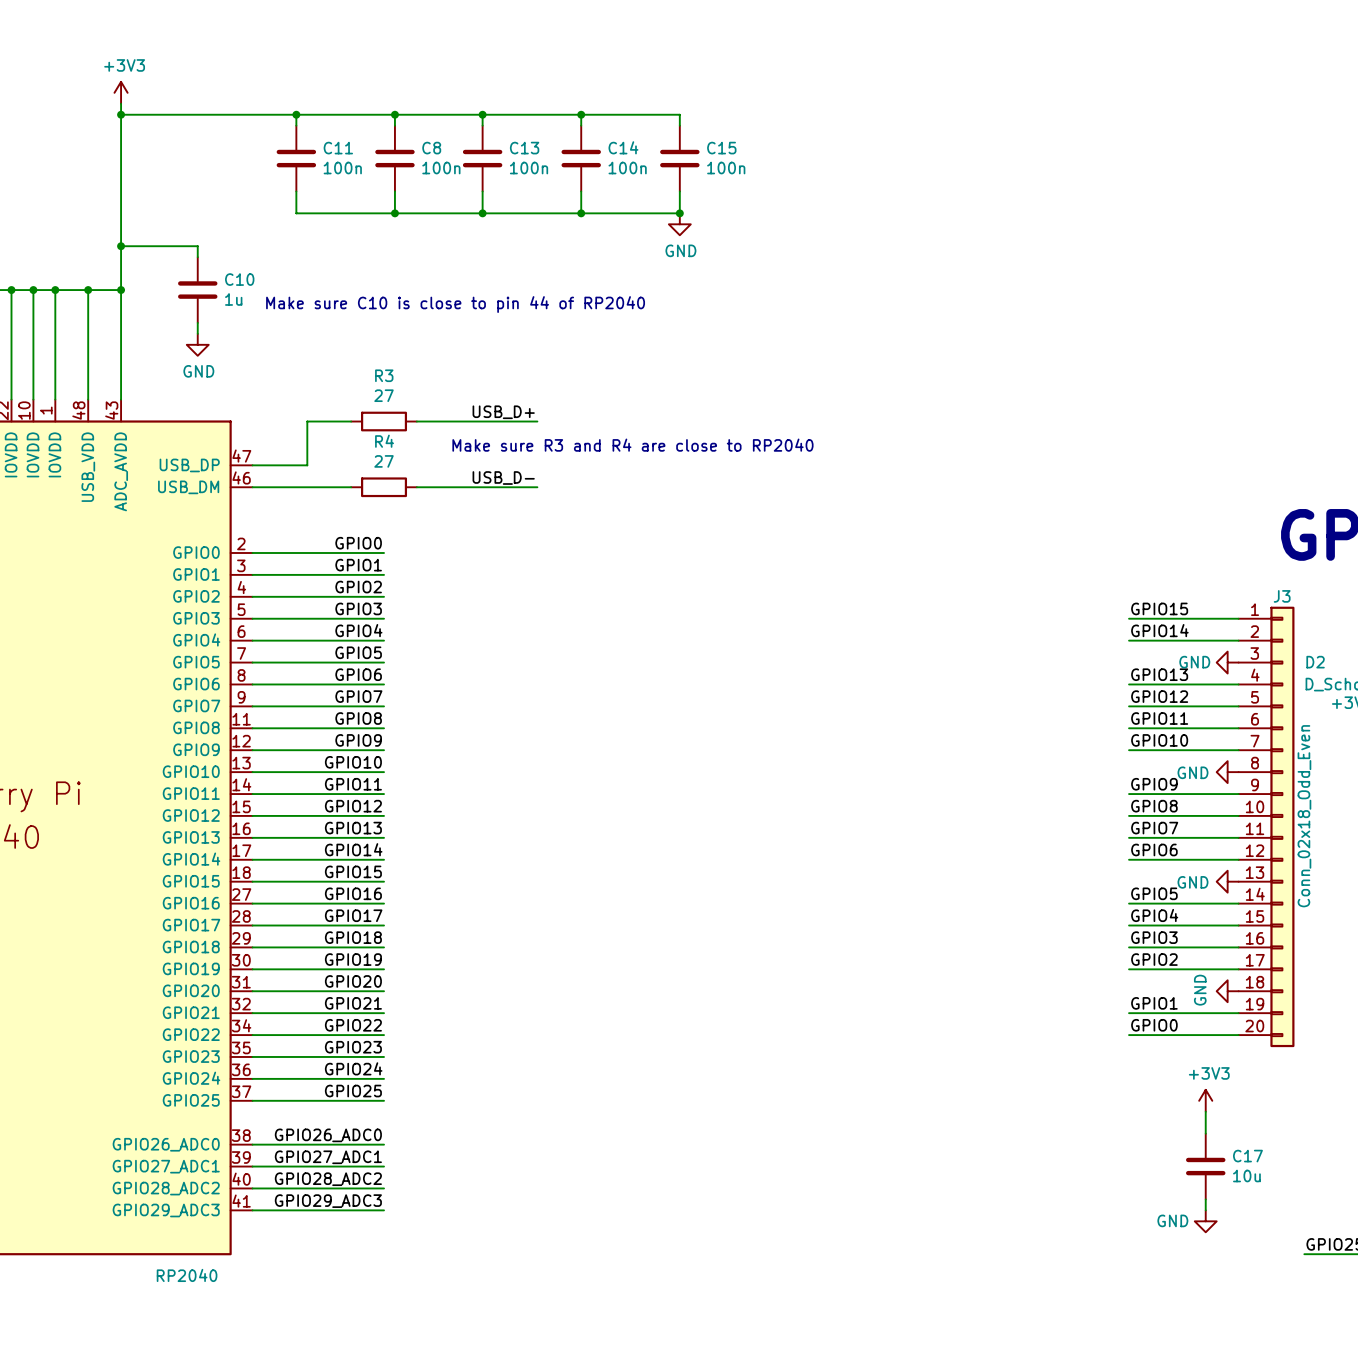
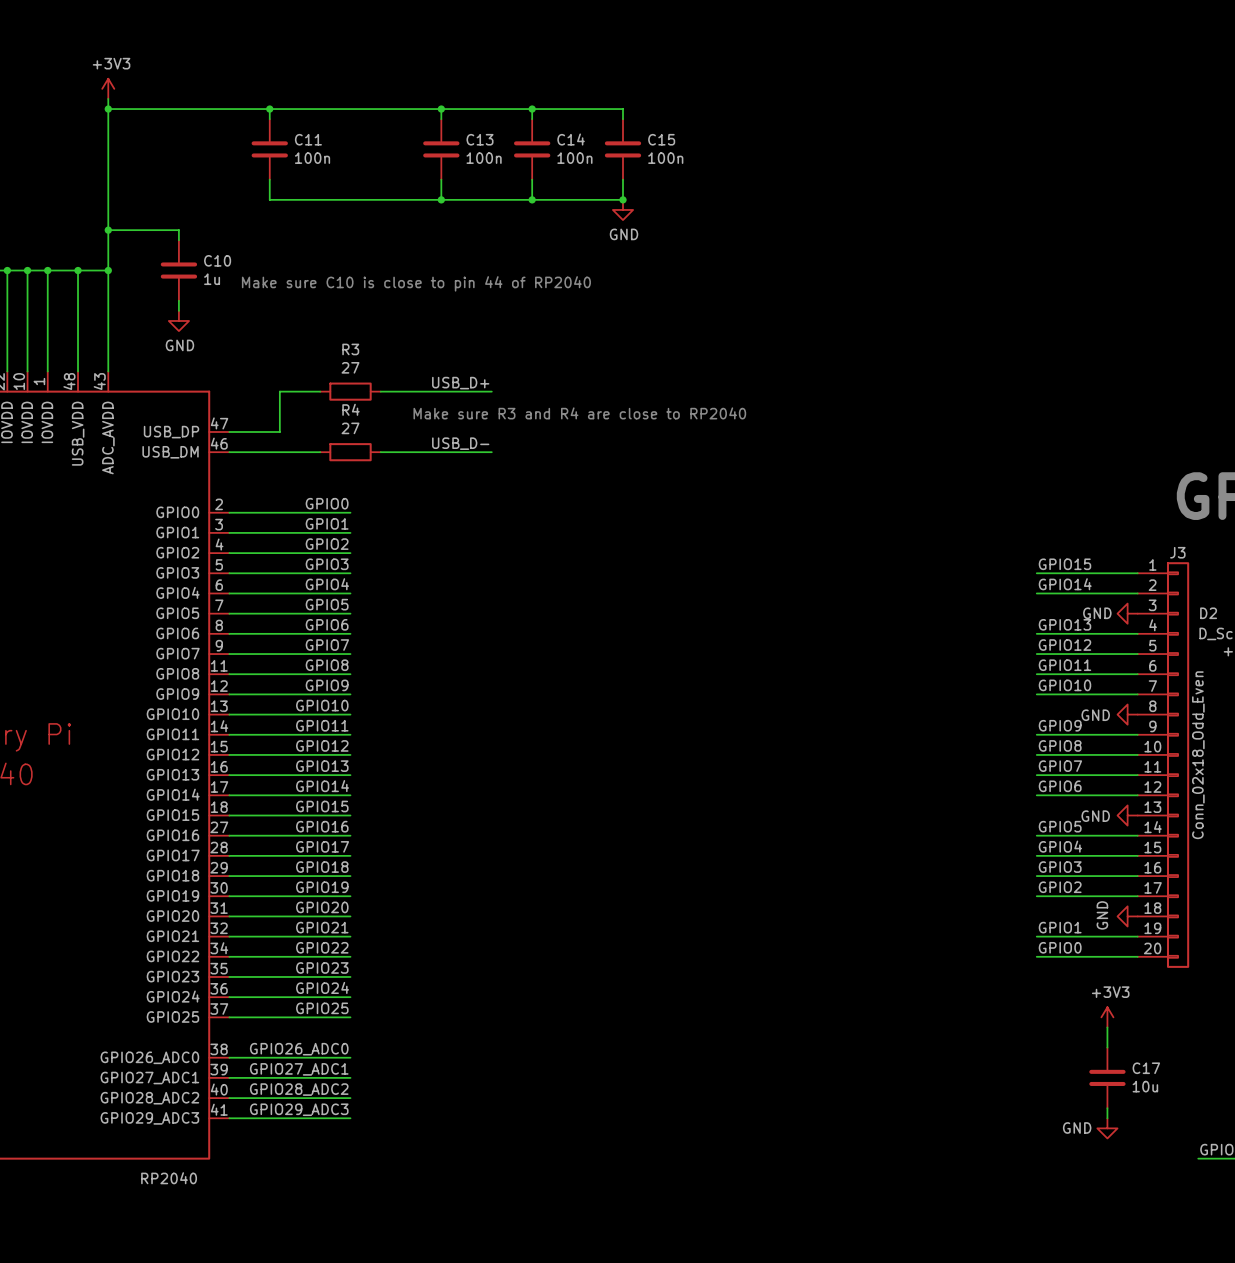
wire: (394, 114) (394, 125) -> none
junction: (394, 114) -> none
C8: 100n (394, 158) -> none
wire: (394, 191) (394, 213) -> none
junction: (394, 213) -> none

